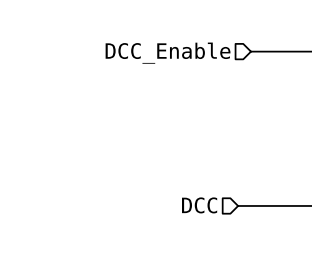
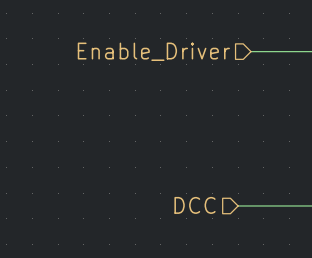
hierarchical label: DCC_Enable (168, 53) -> Enable_Driver (153, 51)

